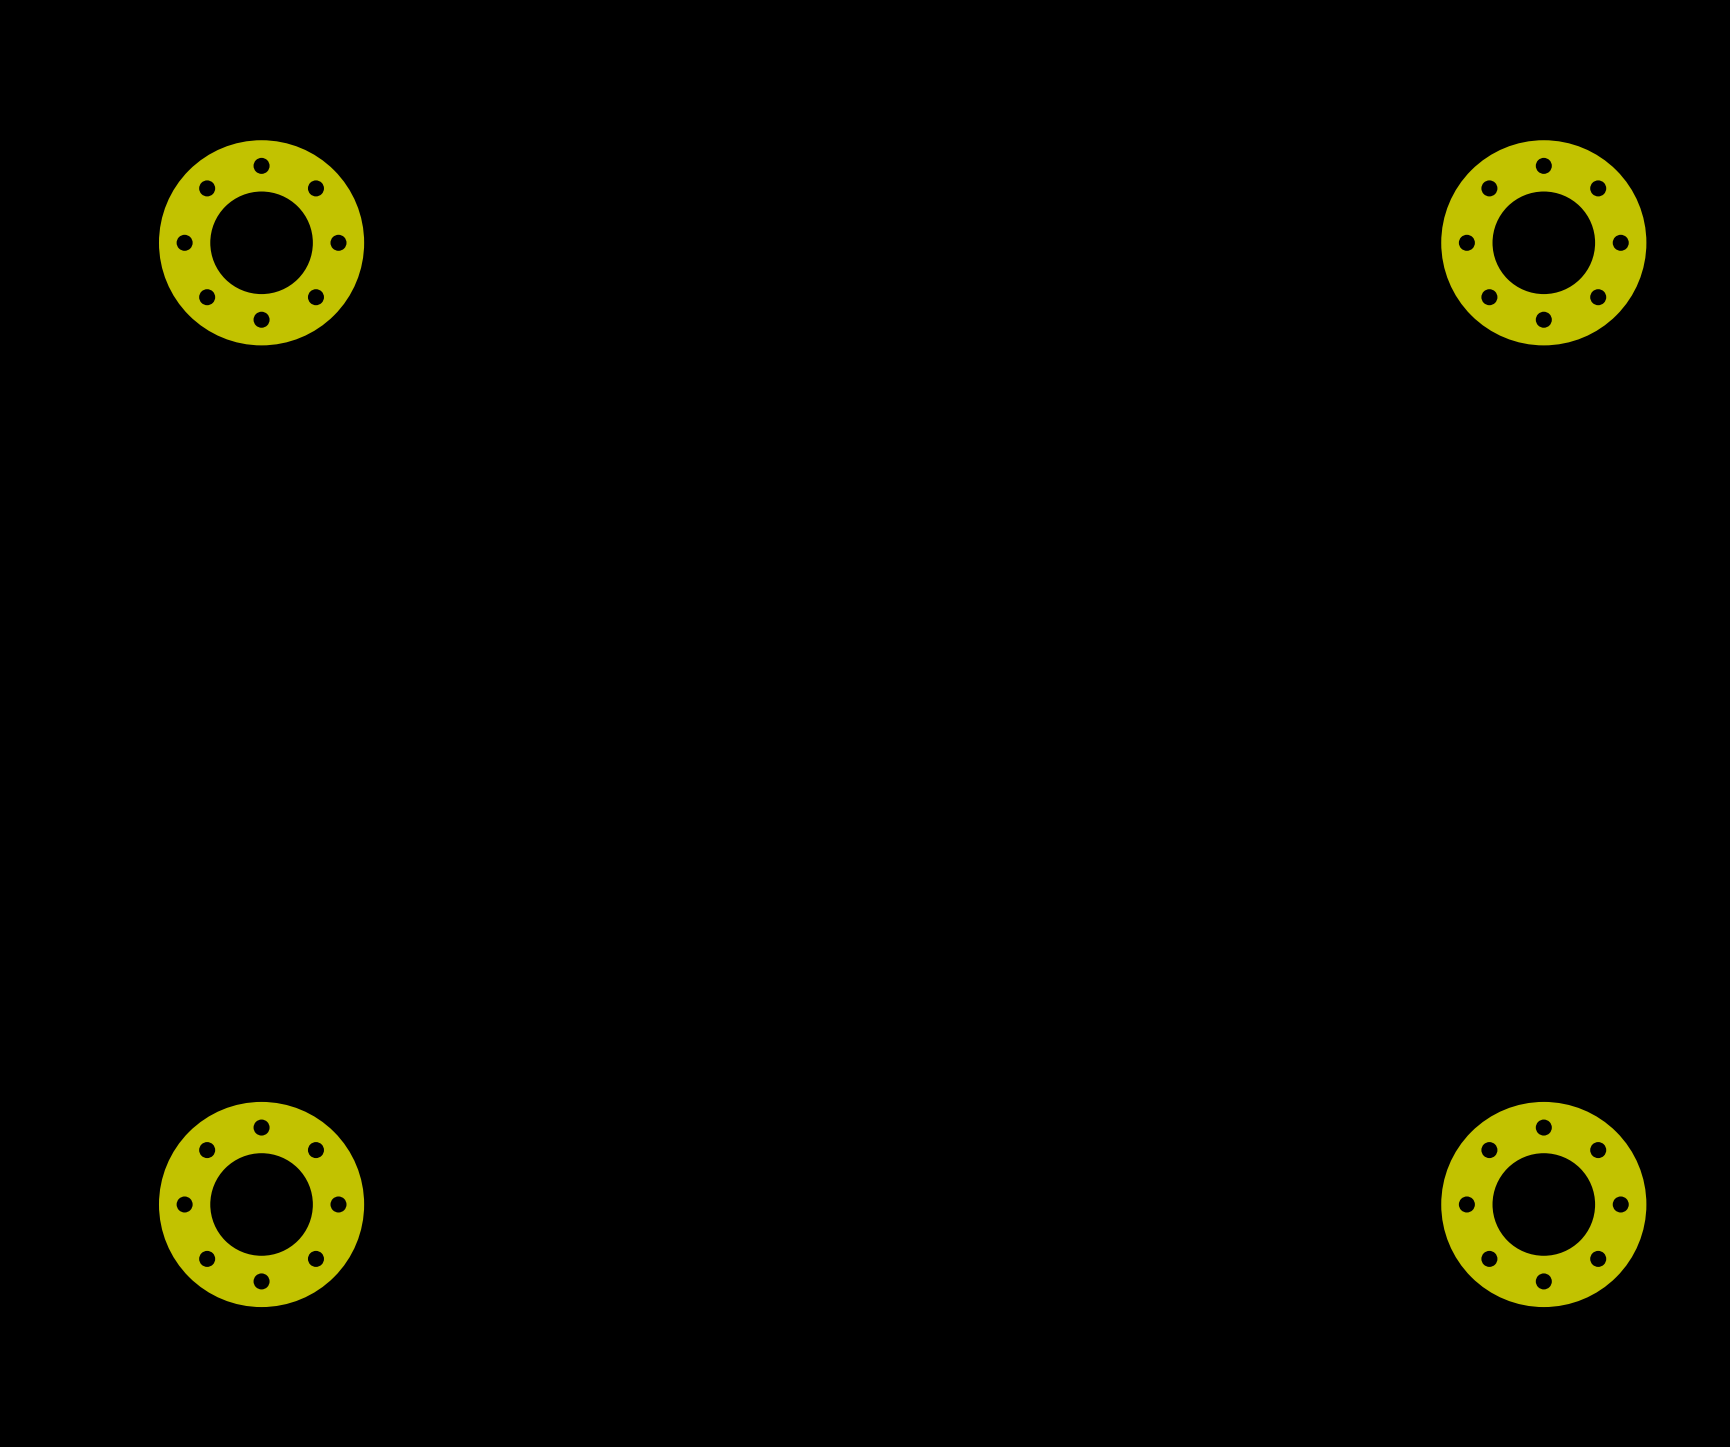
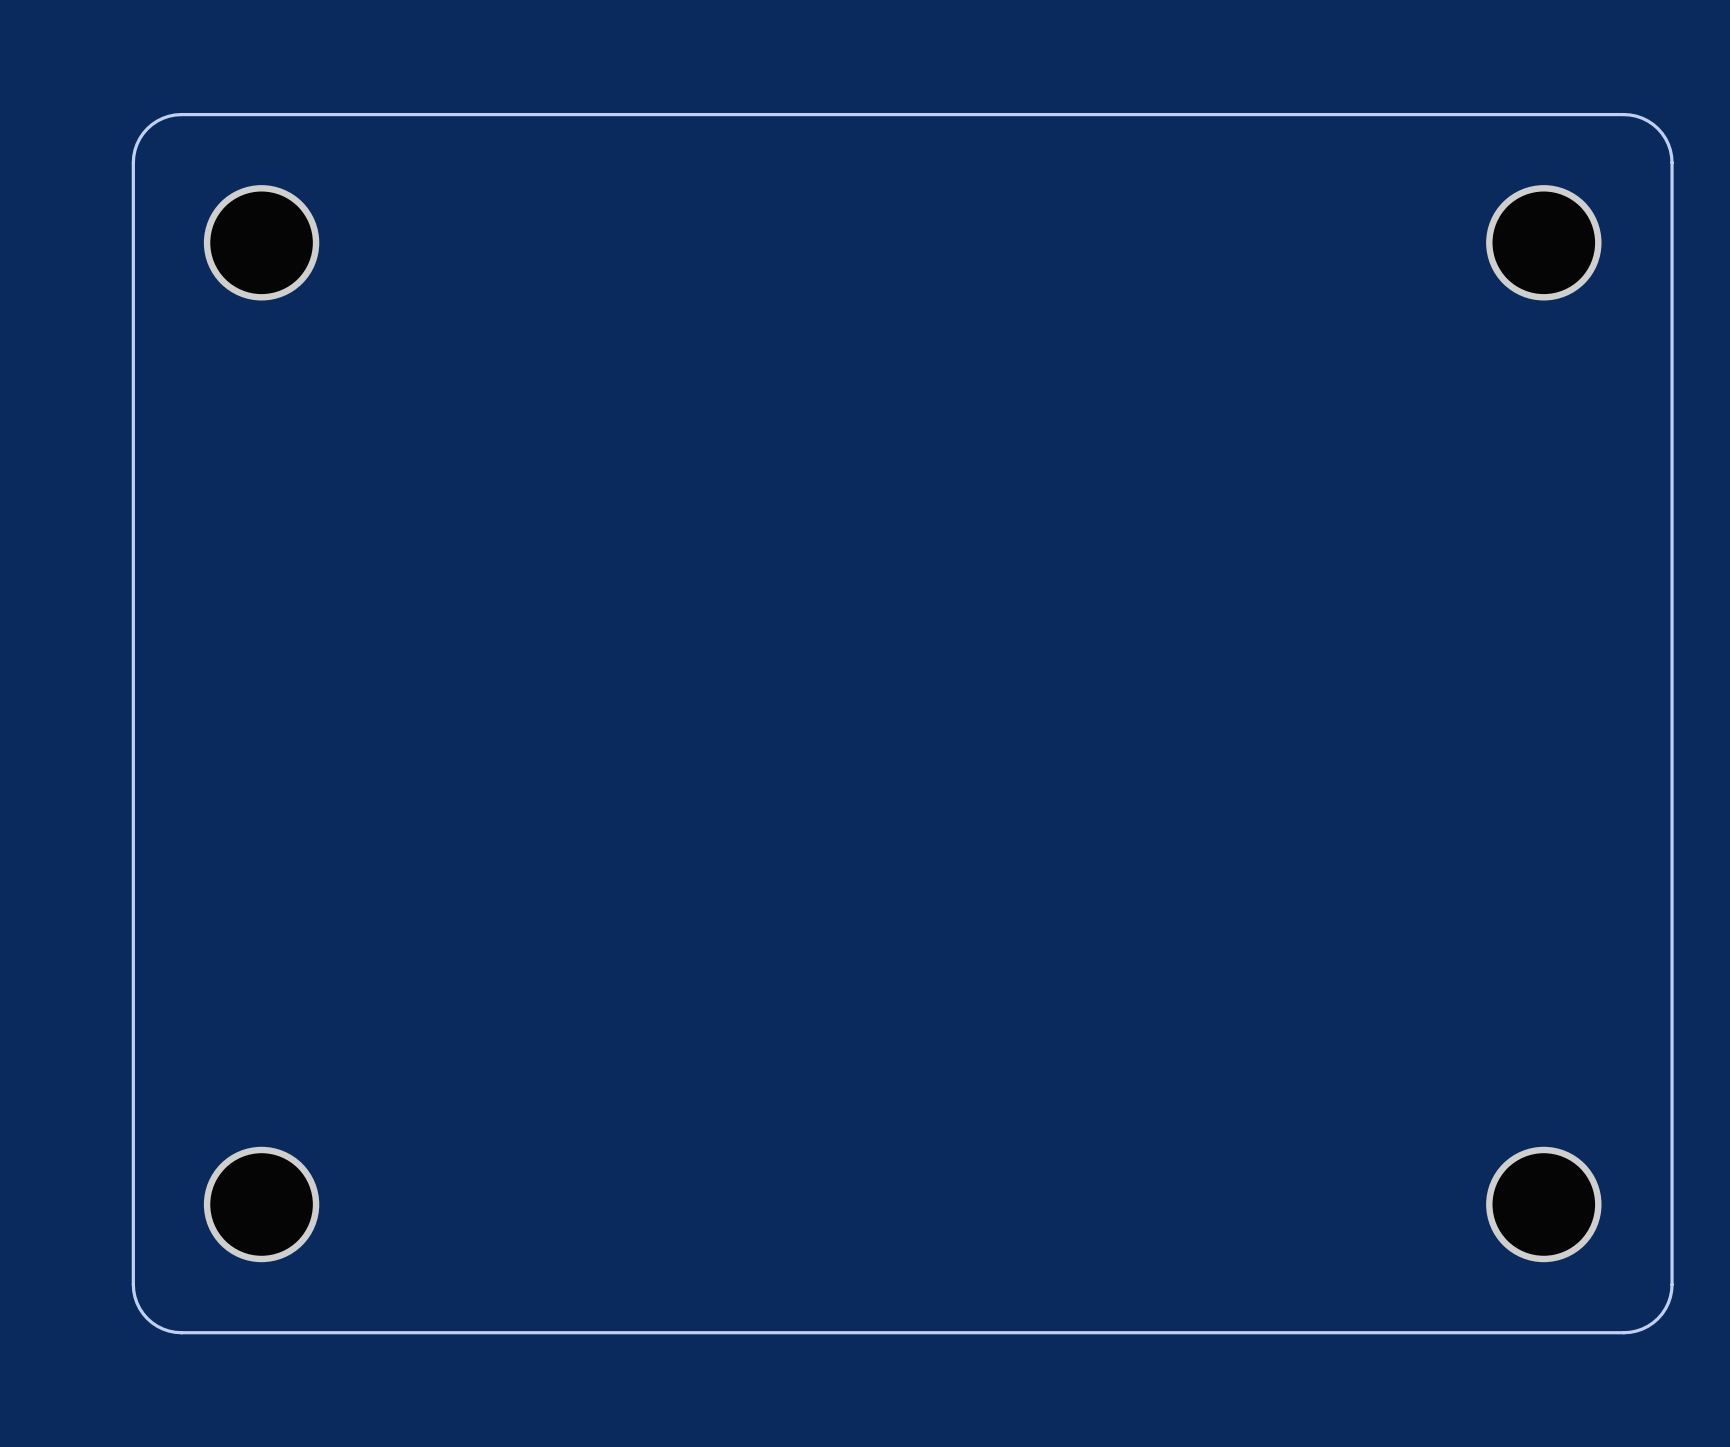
board edge: none -> (1623, 114) (181, 114) (163, 118) (152, 124) (139, 138) (134, 150) (133, 162) (133, 1284) (136, 1303) (143, 1313) (157, 1326) (168, 1331) (181, 1332) (1623, 1332) (1636, 1331) (1653, 1322) (1662, 1313) (1668, 1303) (1672, 1284) (1672, 162) (1668, 144) (1657, 128) (1642, 118) (1623, 114)
part footprint: [158, 140, 365, 346] -> [203, 185, 320, 301]
part footprint: [1441, 140, 1647, 346] -> [1486, 185, 1602, 301]
part footprint: [158, 1101, 365, 1308] -> [203, 1146, 320, 1263]
part footprint: [1441, 1101, 1647, 1308] -> [1486, 1146, 1602, 1263]

